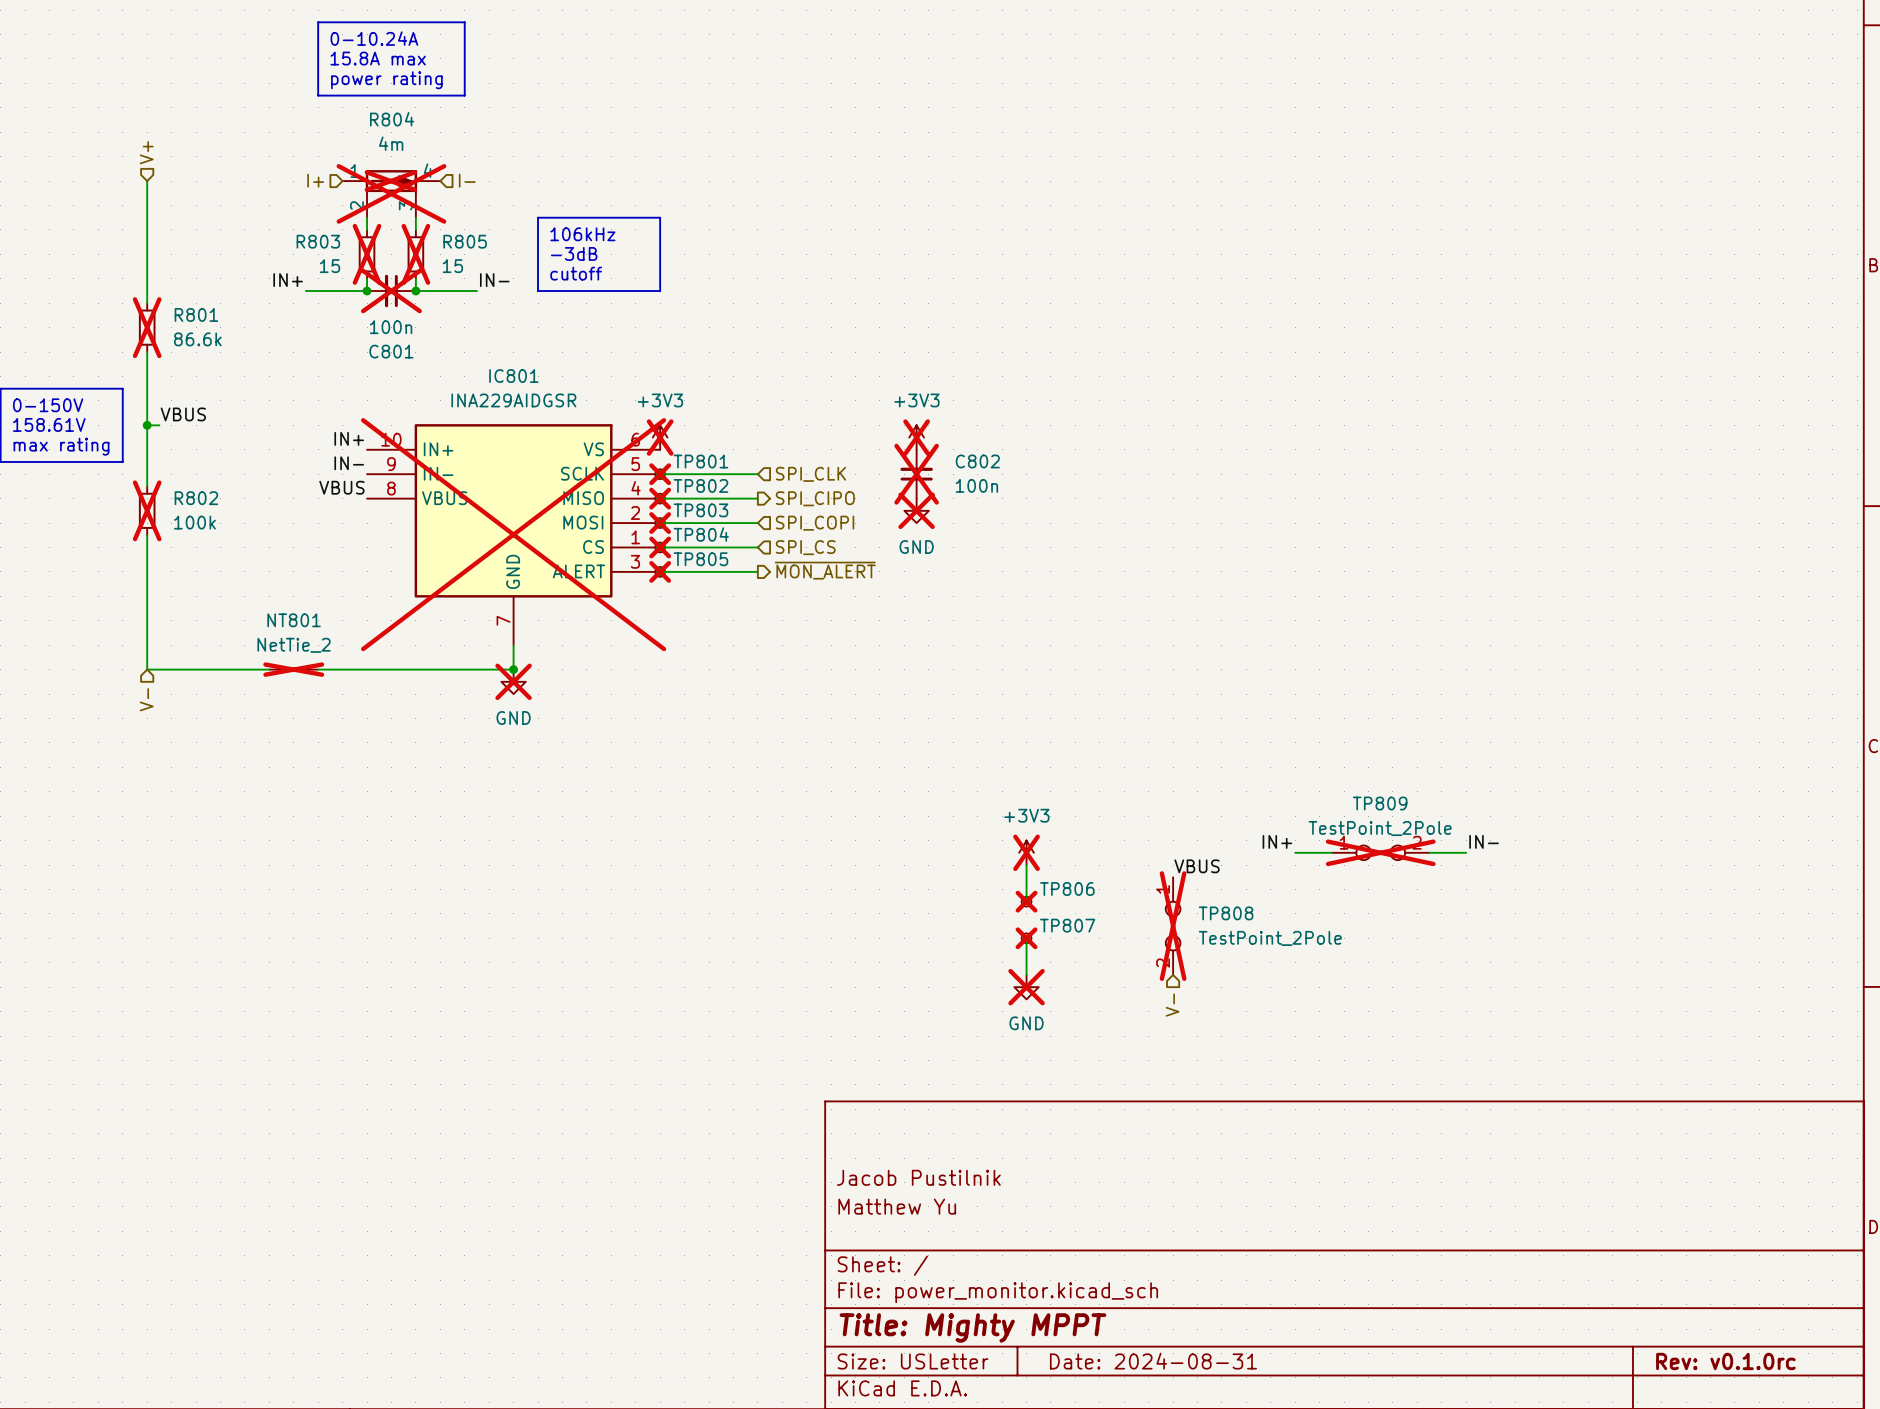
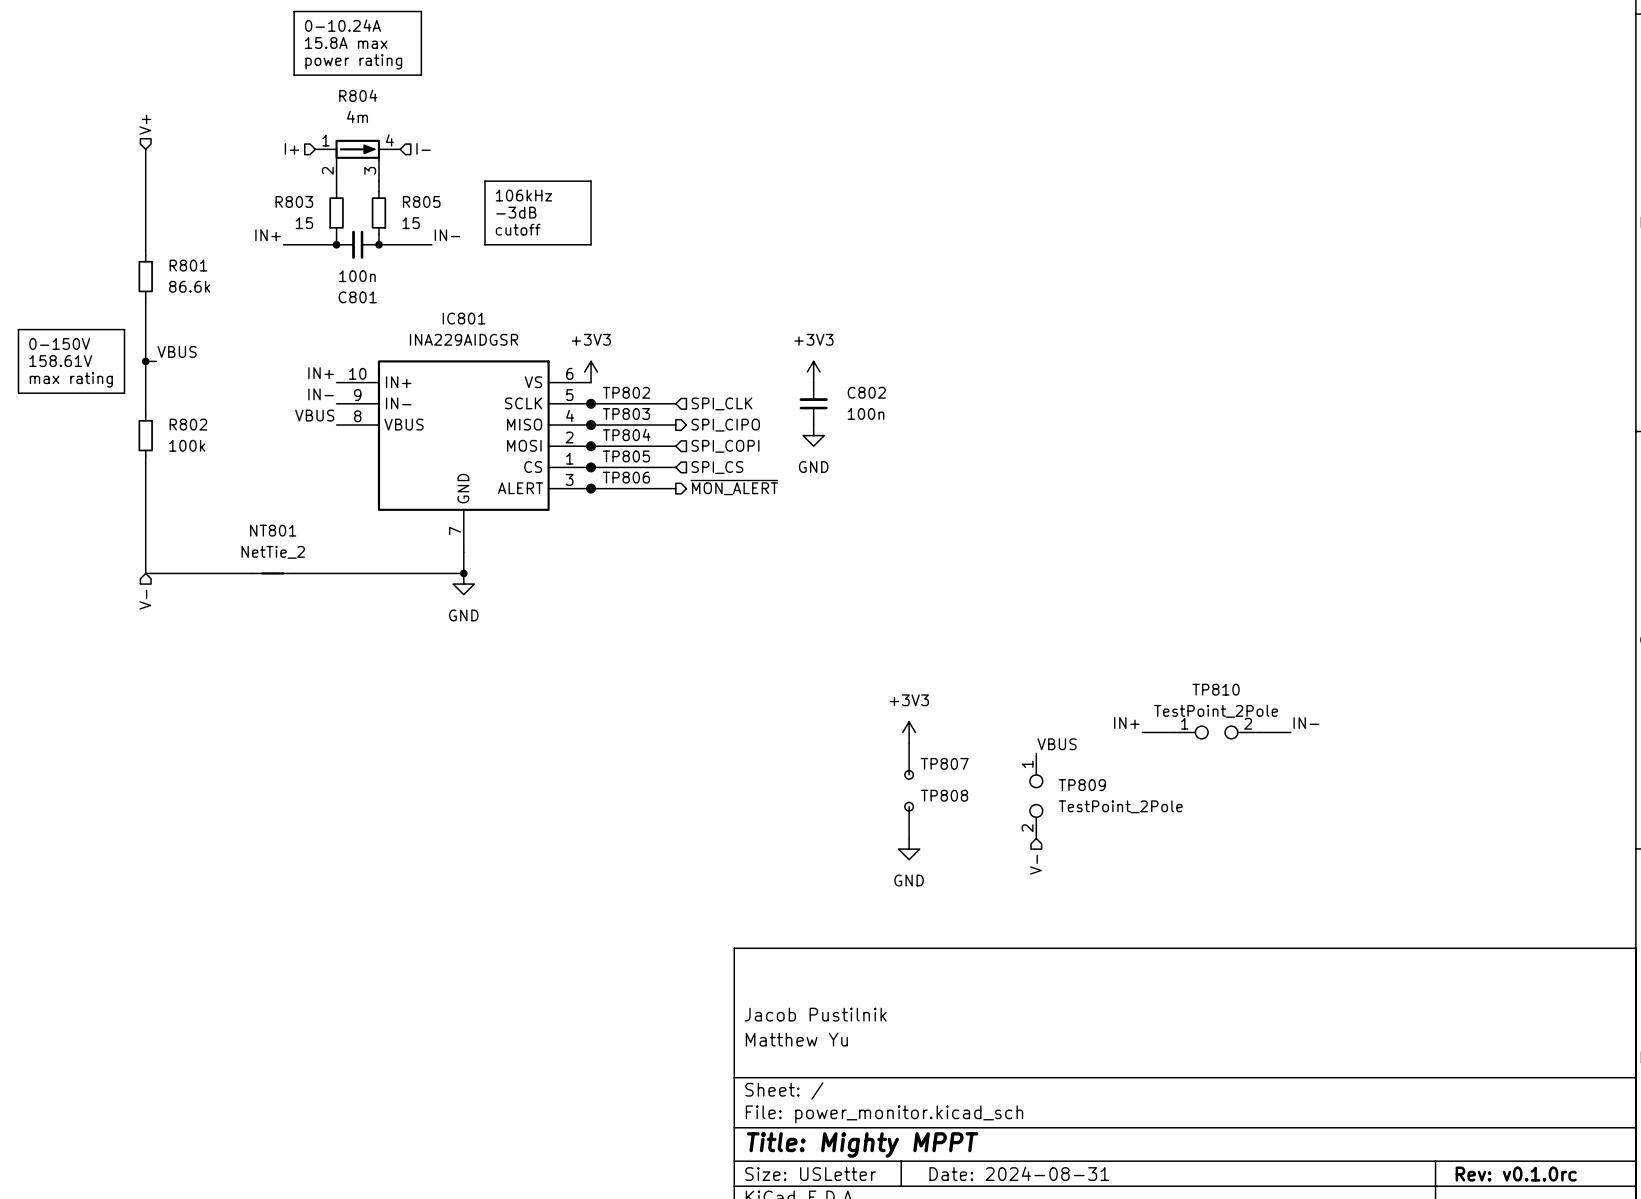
power symbol do-not-place cross: (390, 181) -> none
R804 do-not-place cross: (391, 193) -> none
R803 do-not-place cross: (367, 254) -> none
R805 do-not-place cross: (415, 254) -> none
C801 do-not-place cross: (391, 291) -> none
R801 do-not-place cross: (147, 327) -> none
power symbol do-not-place cross: (660, 437) -> none
power symbol do-not-place cross: (916, 437) -> none
TP801 name: TP801 (700, 461) -> TP802 (626, 392)
TP801 do-not-place cross: (660, 474) -> none
C802 do-not-place cross: (916, 474) -> none
TP802 name: TP802 (700, 485) -> TP803 (626, 414)
TP802 do-not-place cross: (660, 498) -> none
R802 do-not-place cross: (147, 510) -> none
TP803 name: TP803 (700, 510) -> TP804 (626, 434)
power symbol do-not-place cross: (916, 510) -> none
TP803 do-not-place cross: (660, 523) -> none
IC801 do-not-place cross: (513, 534) -> none
TP804 name: TP804 (701, 534) -> TP805 (626, 456)
TP804 do-not-place cross: (660, 547) -> none
TP805 name: TP805 (700, 559) -> TP806 (626, 477)
TP805 do-not-place cross: (660, 571) -> none
NT801 do-not-place cross: (293, 669) -> none
power symbol do-not-place cross: (513, 681) -> none
TP809 name: TP809 (1380, 803) -> TP810 (1216, 689)
power symbol do-not-place cross: (1026, 852) -> none
TP809 do-not-place cross: (1380, 852) -> none
TP806 name: TP806 (1067, 888) -> TP807 (944, 763)
TP806 do-not-place cross: (1026, 901) -> none
TP808 name: TP808 (1226, 913) -> TP809 (1082, 785)
TP807 name: TP807 (1067, 925) -> TP808 (944, 795)
TP808 do-not-place cross: (1173, 926) -> none
TP807 do-not-place cross: (1026, 938) -> none
power symbol do-not-place cross: (1026, 987) -> none

